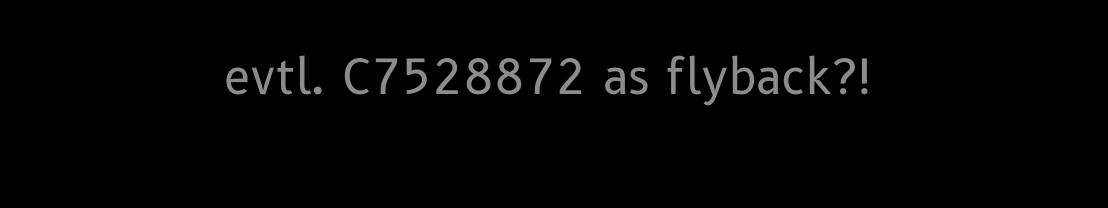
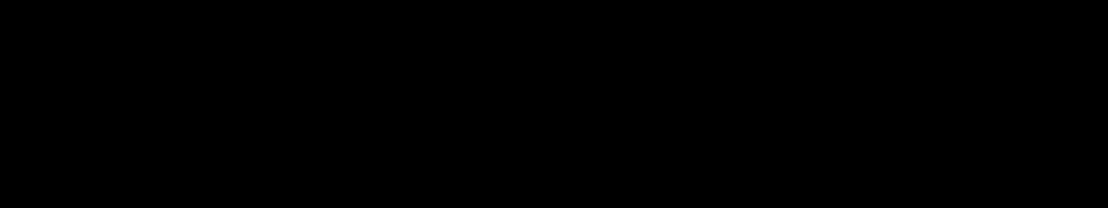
text: evtl. C7528872 as flyback?! (546, 80) -> none

